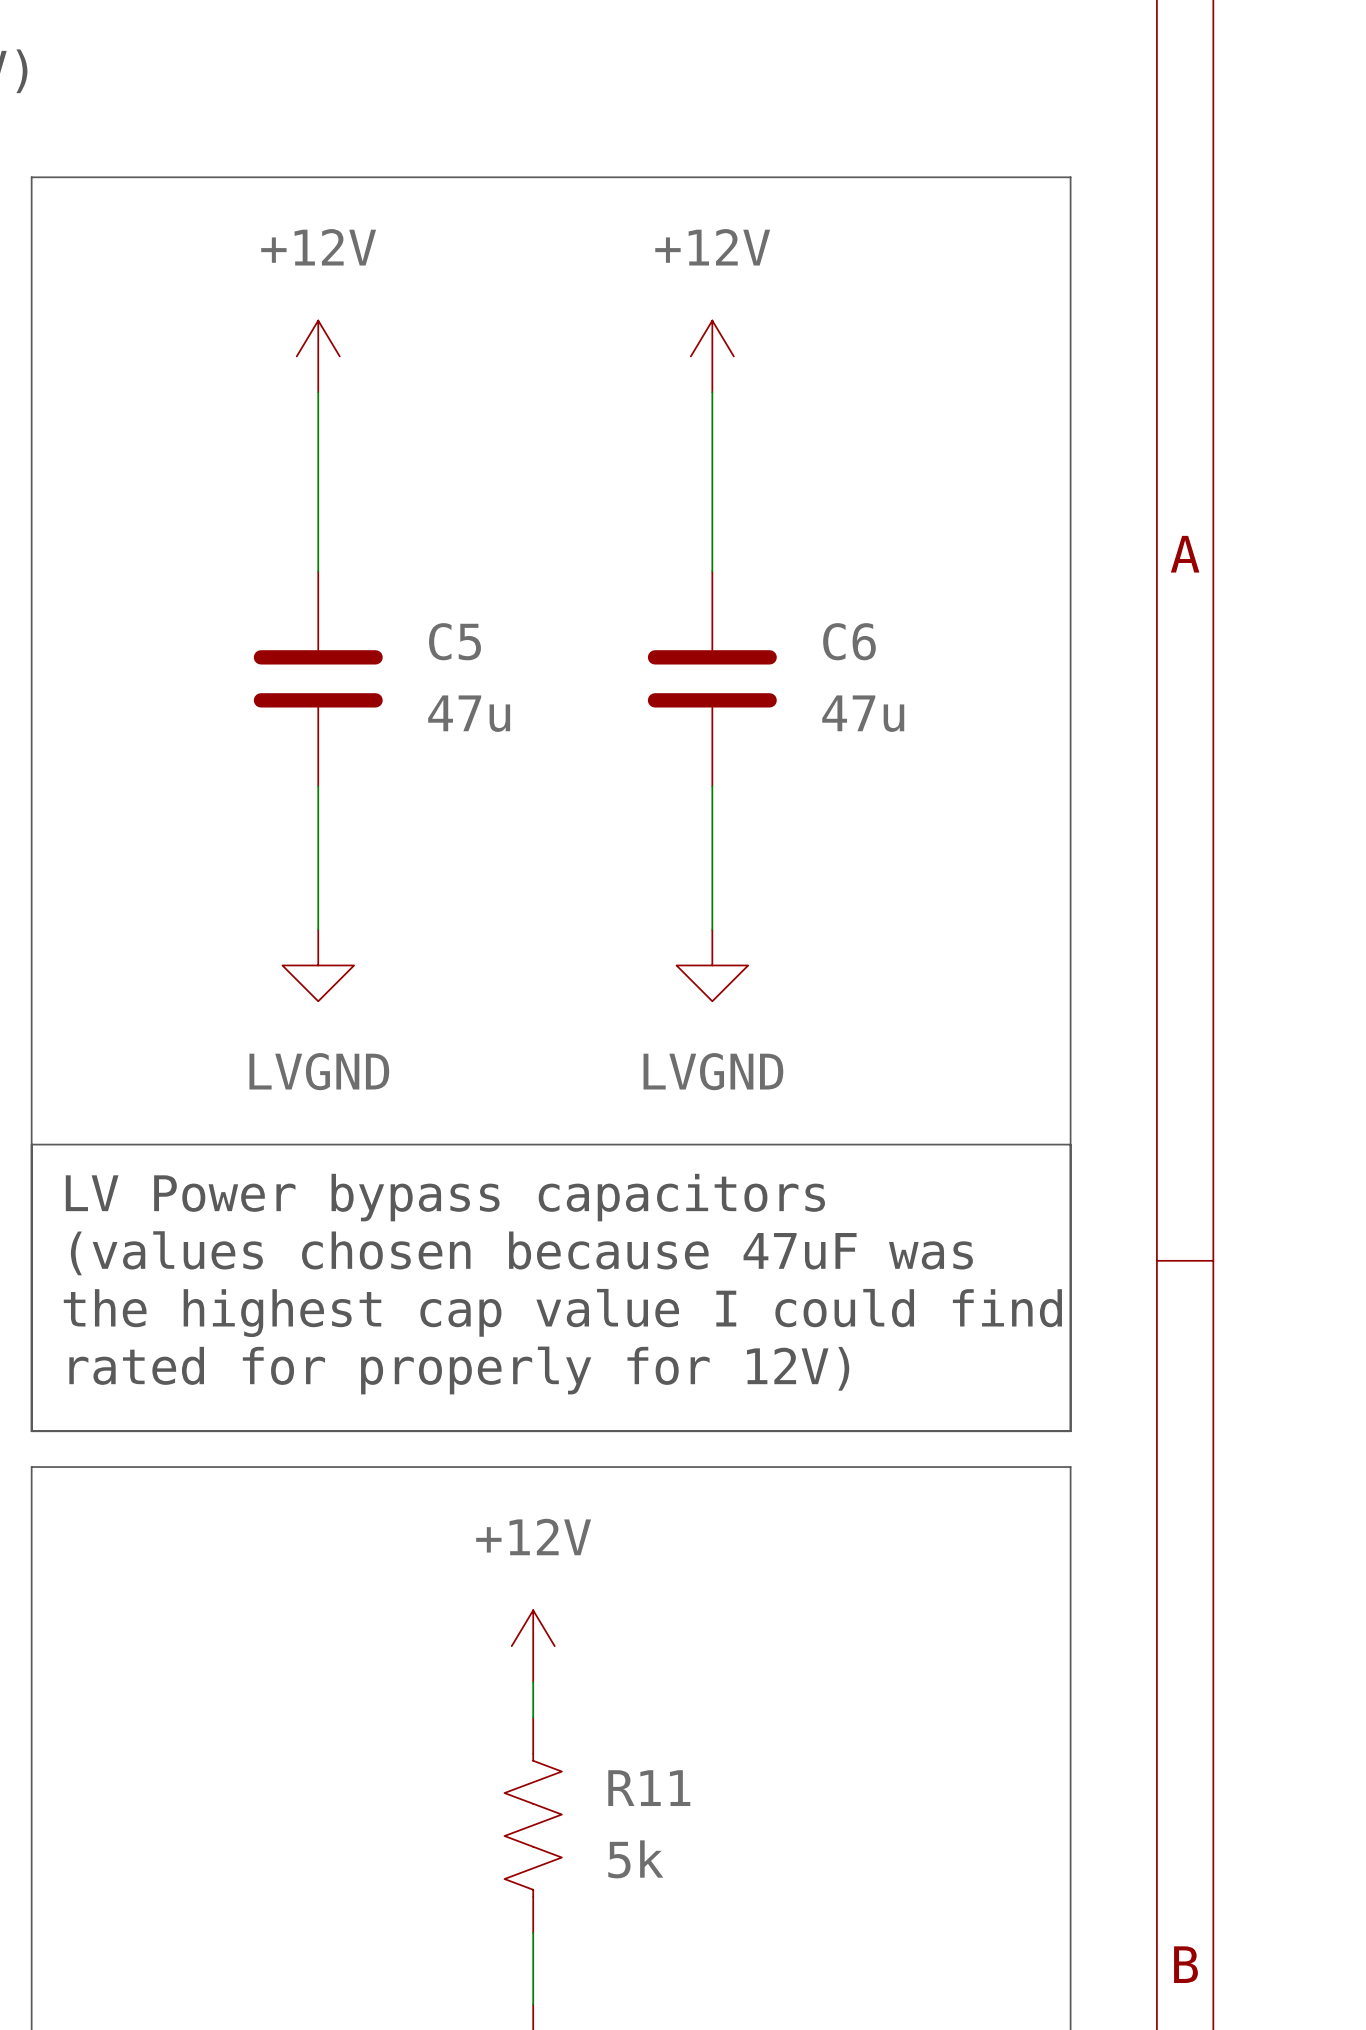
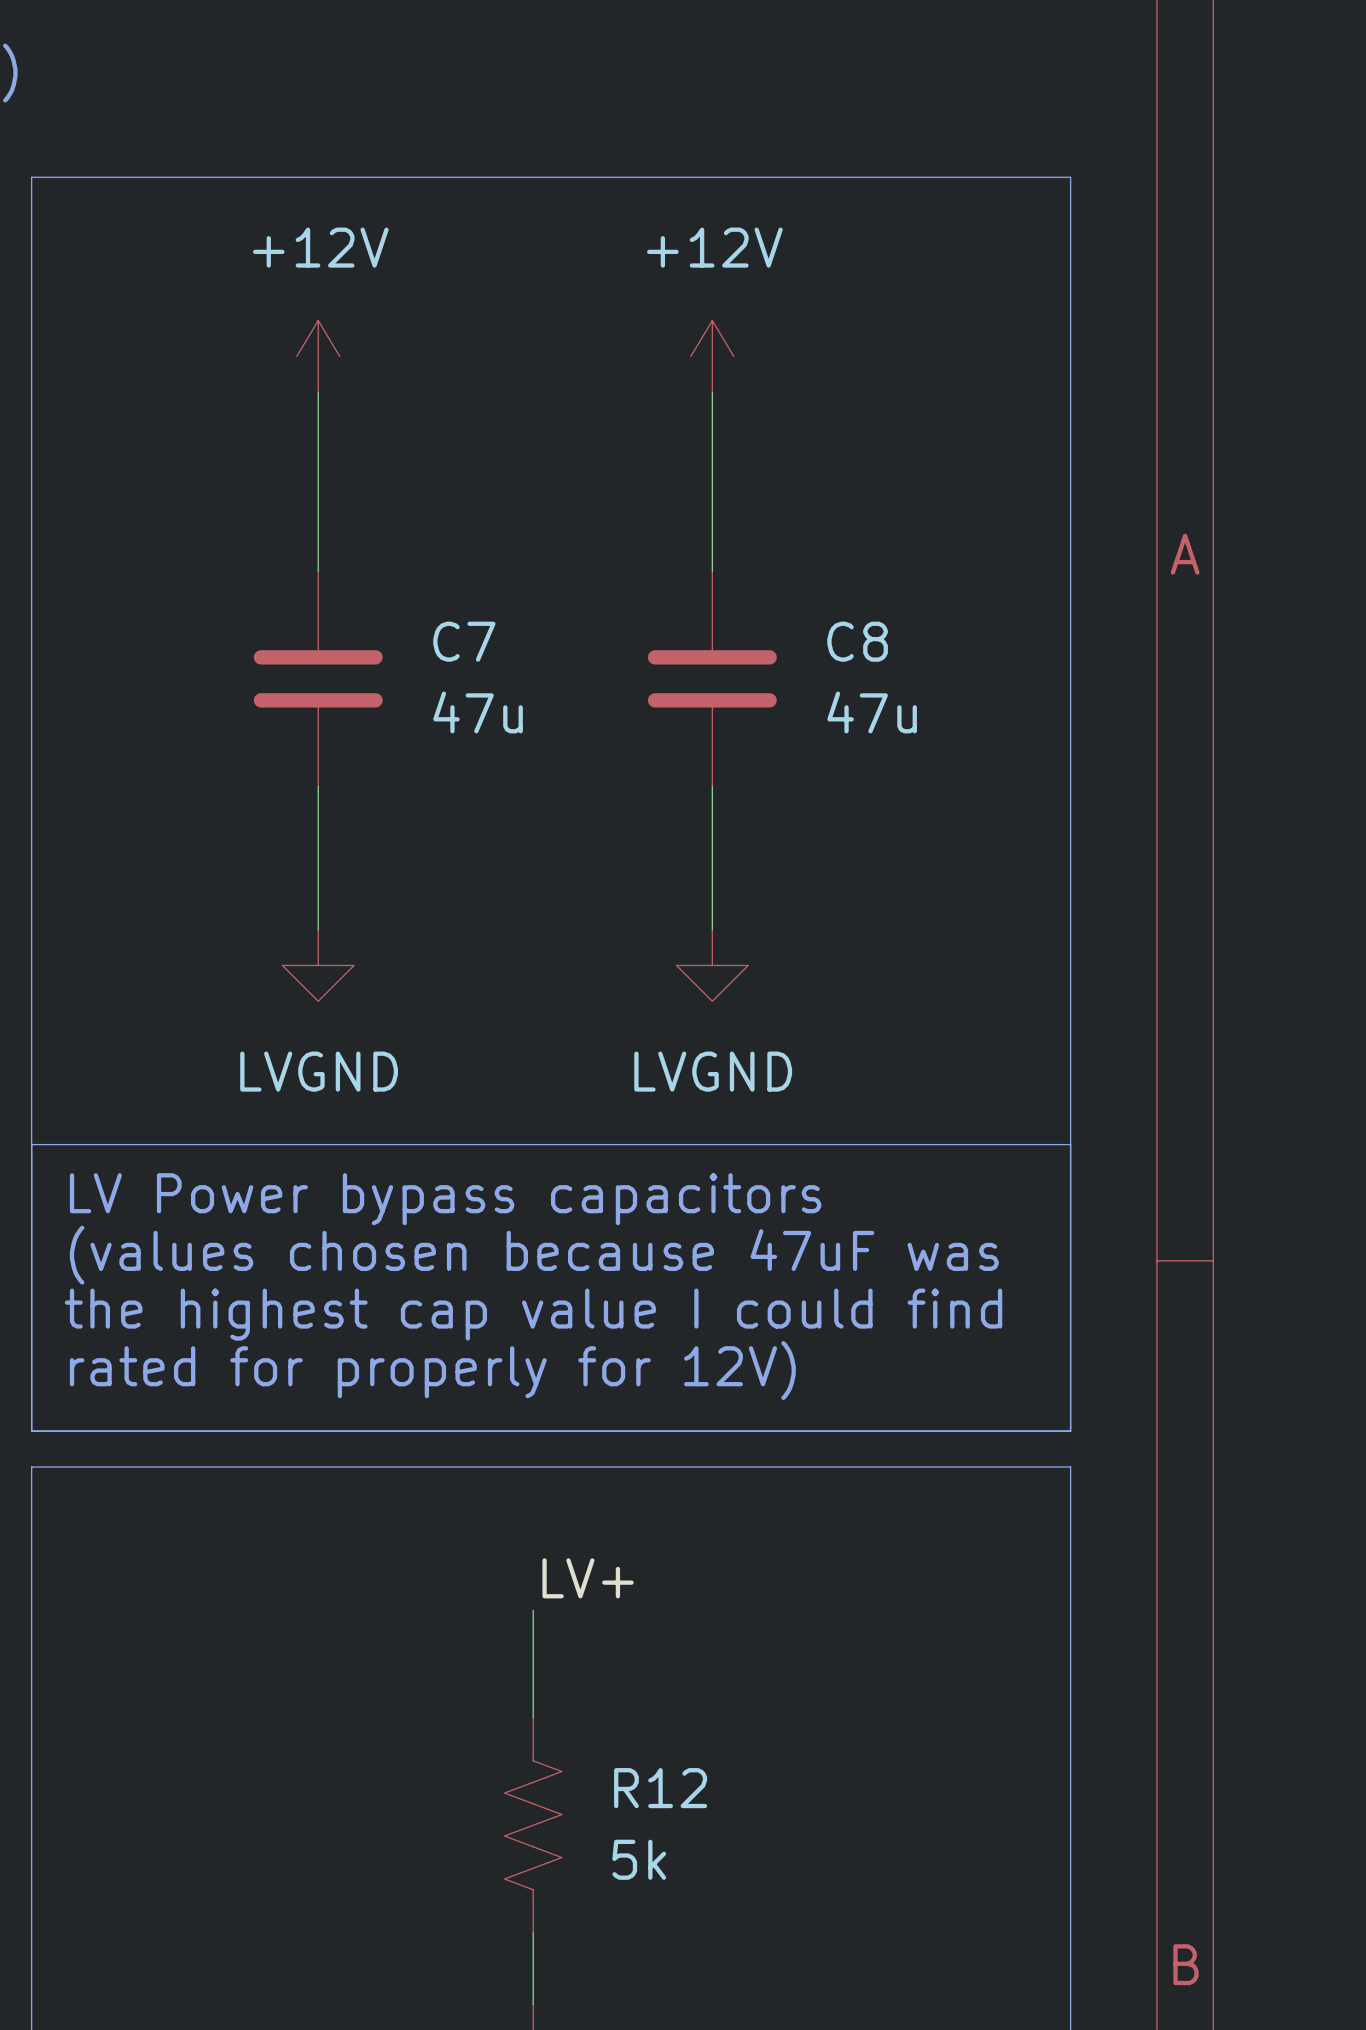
C5 name: C5 (455, 641) -> C7 (464, 641)
C6 name: C6 (849, 641) -> C8 (857, 641)
label: none -> LV+ (588, 1578)
power symbol: +12V (533, 1646) -> none
R11 name: R11 (649, 1788) -> R12 (660, 1788)

